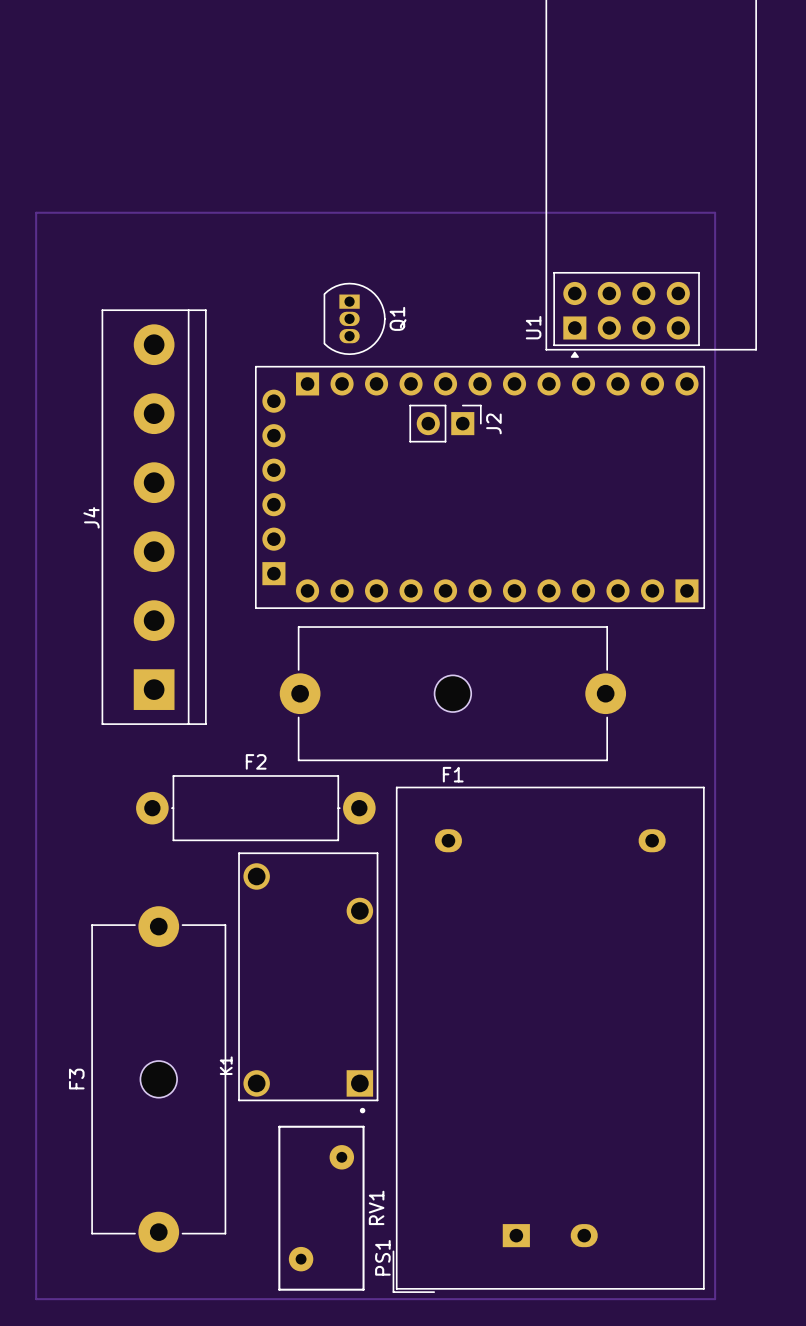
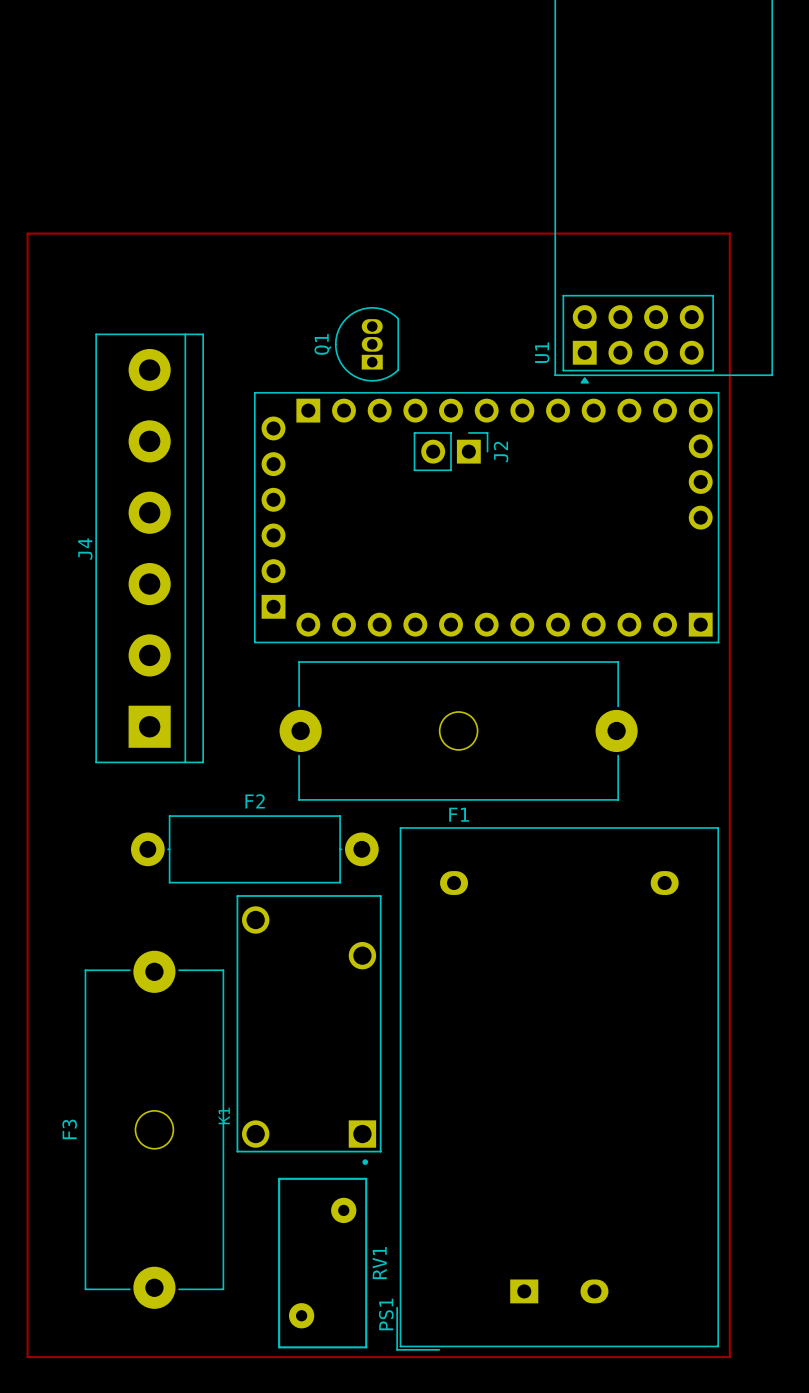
Q1 rotation: 0° (354, 318) -> 180° (366, 344)
part: none -> (700, 446)
part: none -> (700, 481)
part: none -> (700, 517)

